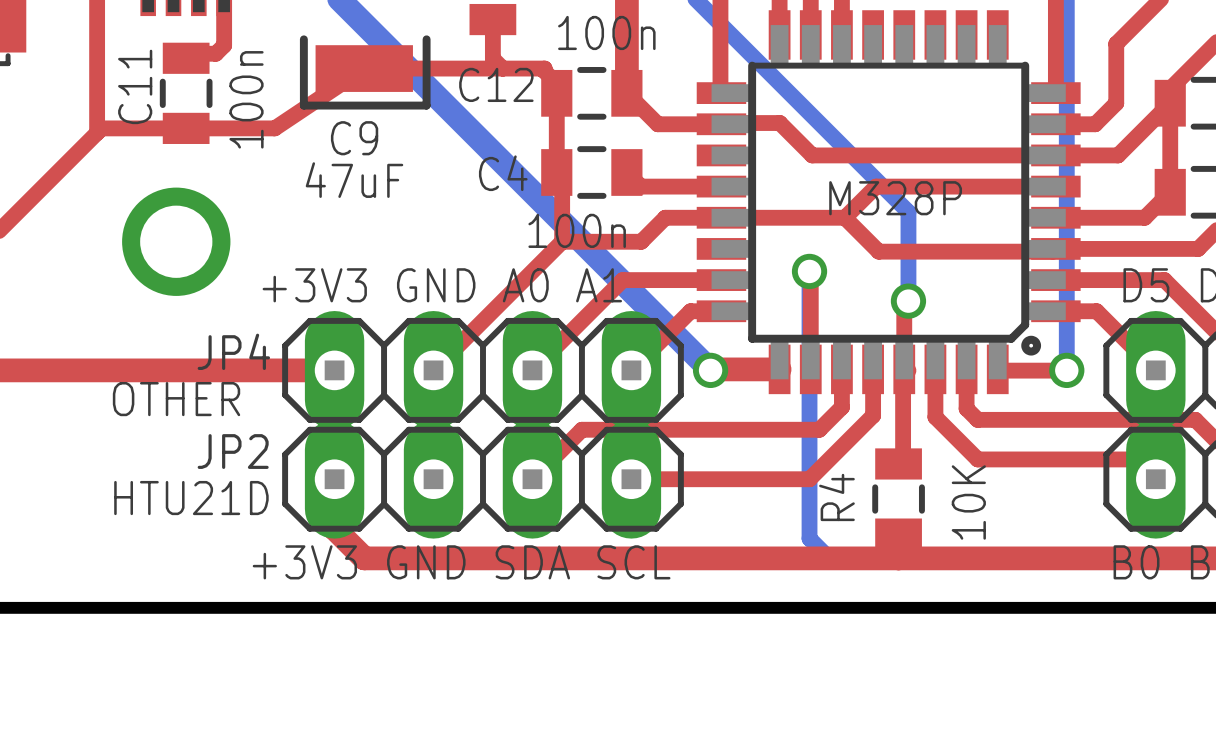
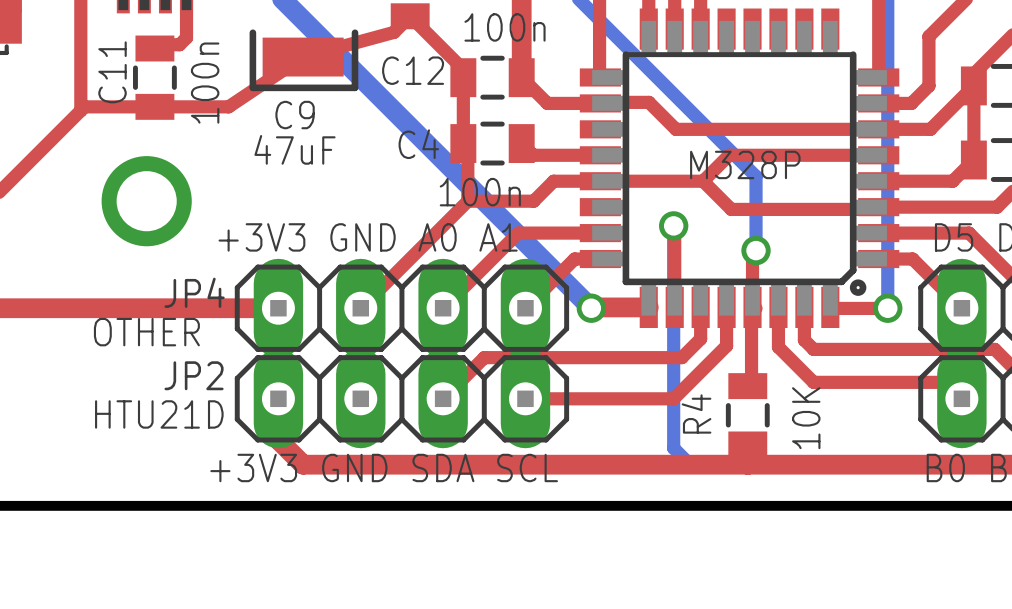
top track: (492, 19) (492, 58) (502, 68) -> none
top track: (364, 68) (544, 68) (544, 71) -> (303, 57) (394, 32) (410, 16) (453, 59)

